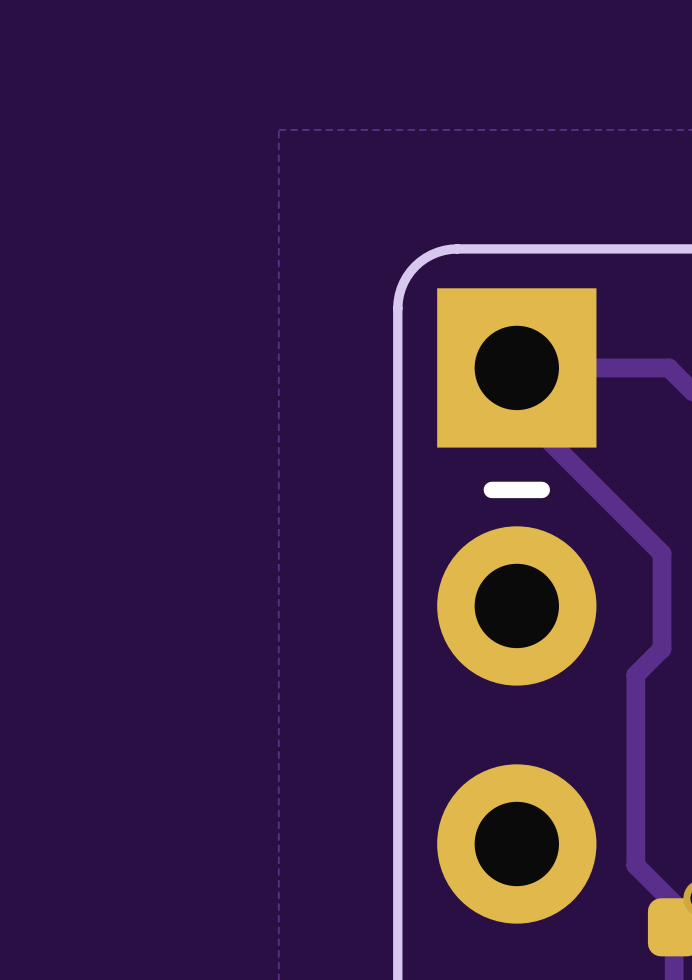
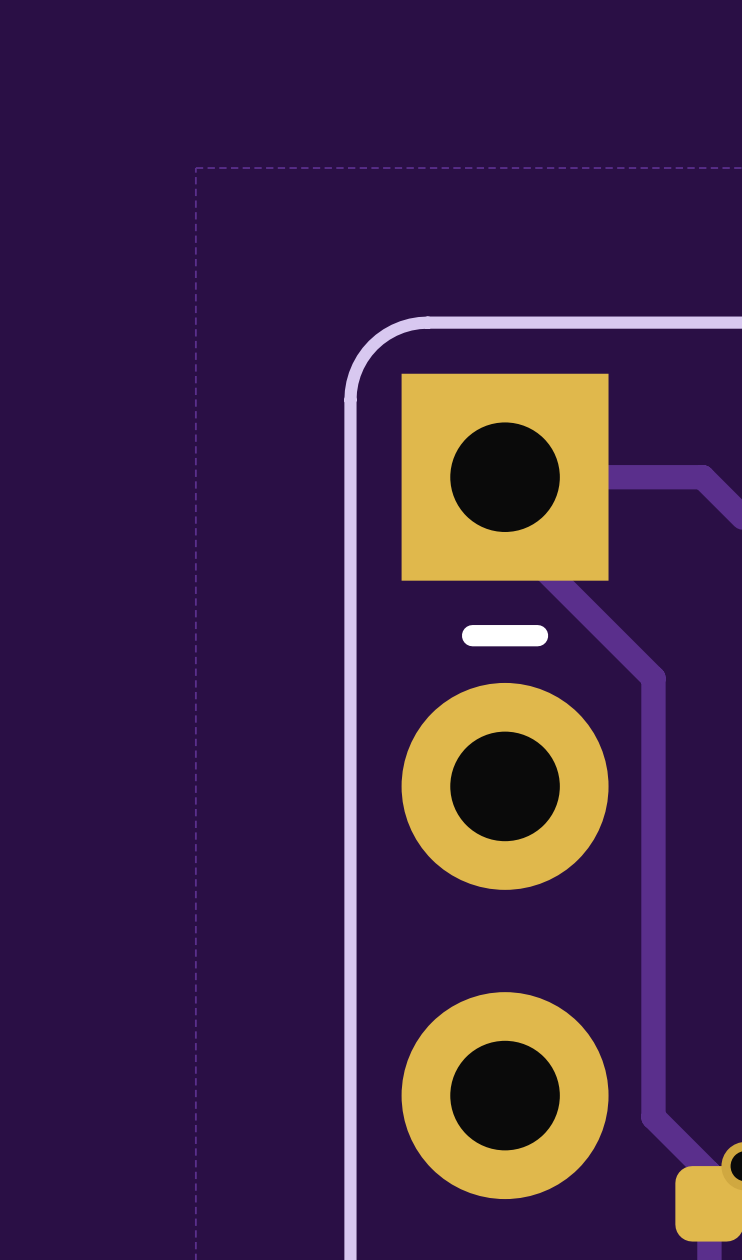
track: (631, 522) (662, 553) (662, 648) (635, 674) (635, 865) -> (653, 678) (653, 1117) (659, 1123)

